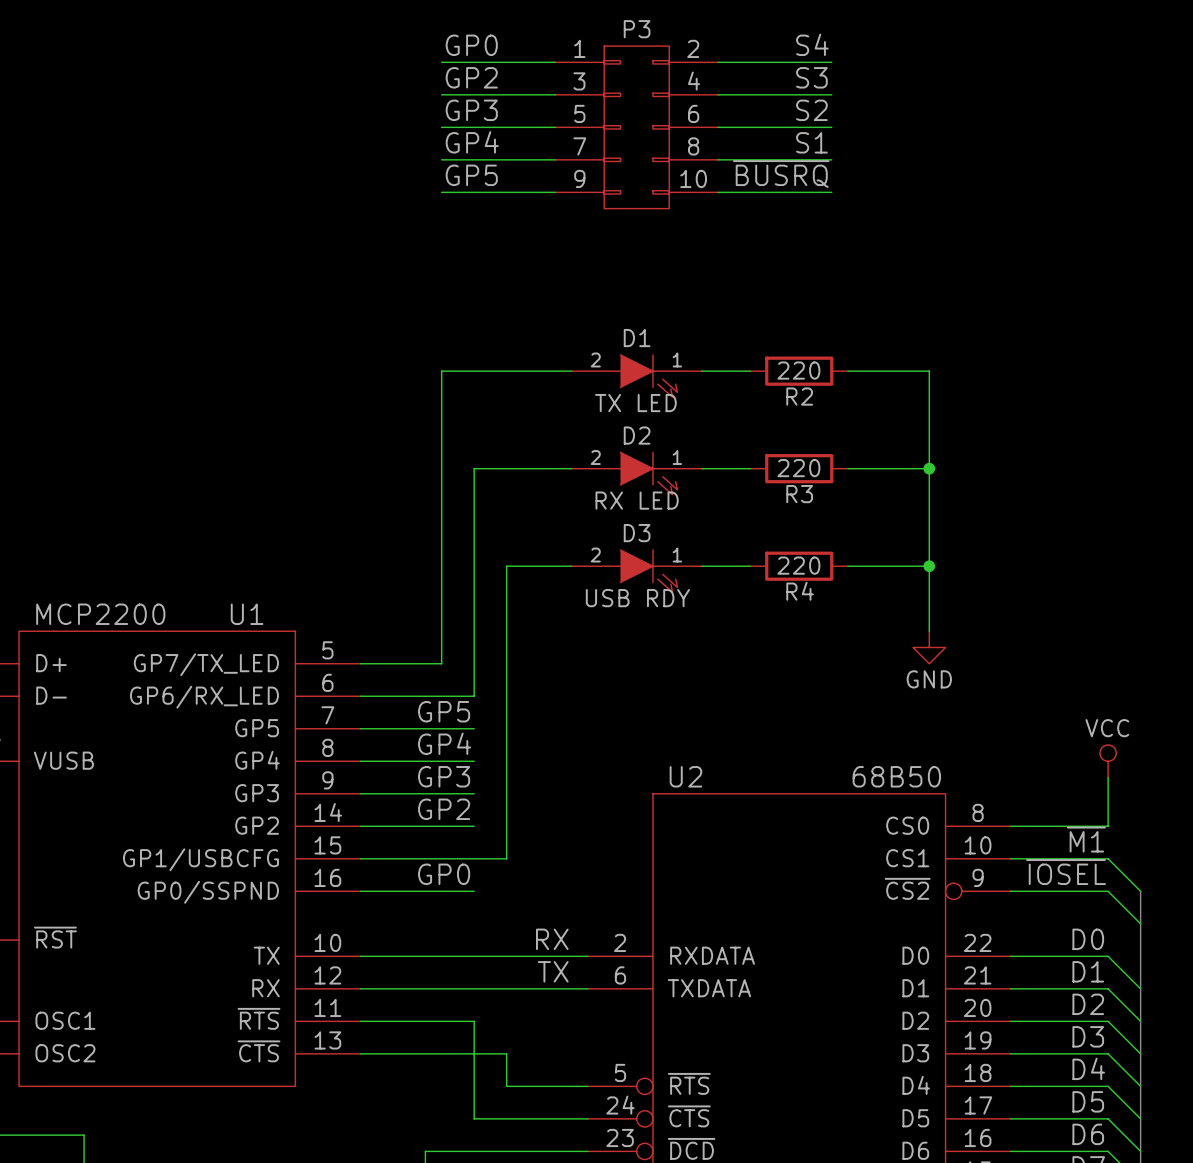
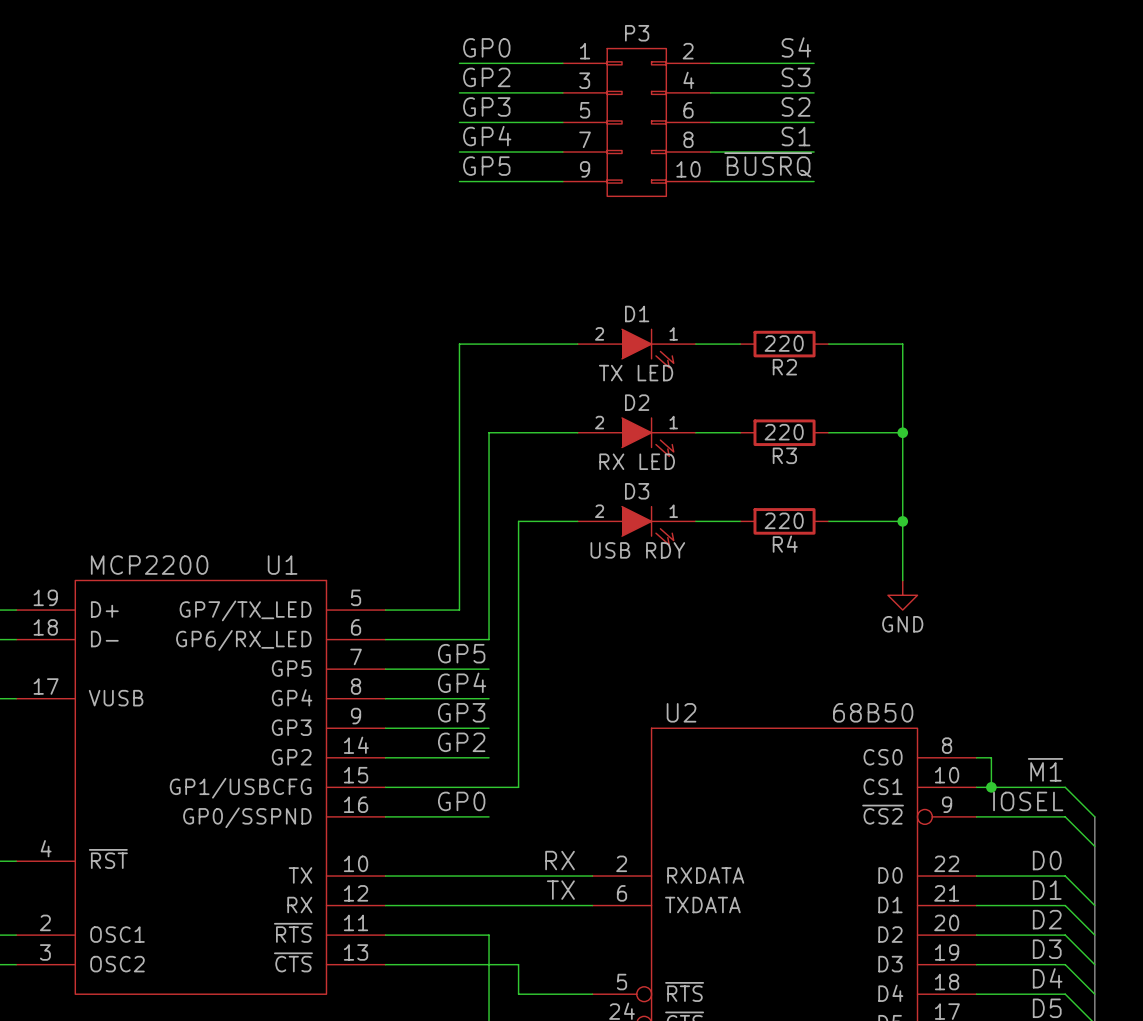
power symbol: VCC (1108, 761) -> none
wire: (1108, 777) (1108, 826) (1026, 826) -> (991, 787) (991, 757)
junction: none -> (991, 787)
label: ~{IOSEL} (1066, 872) -> IOSEL (1028, 801)

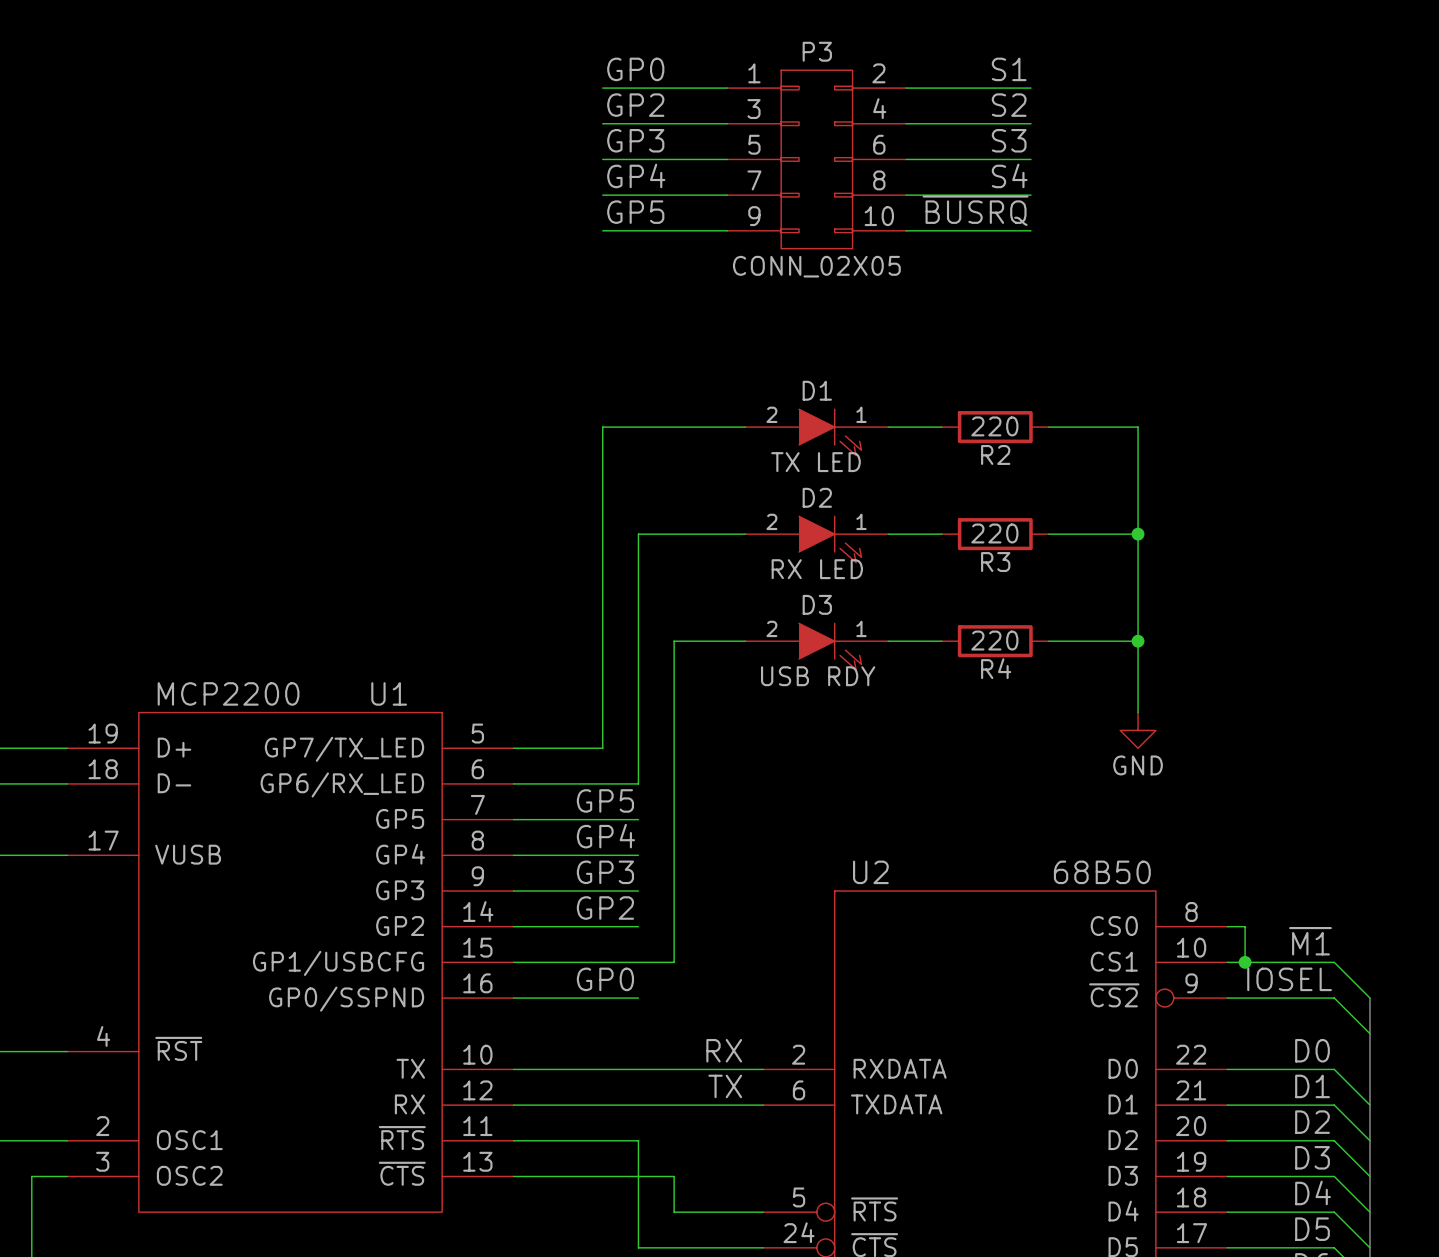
label: S4 (796, 47) -> S1 (1009, 69)
label: S3 (796, 77) -> S2 (1009, 105)
label: S2 (796, 106) -> S3 (1009, 140)
label: S1 (796, 136) -> S4 (1009, 175)
P3 value: none -> CONN_02X05 (816, 266)

